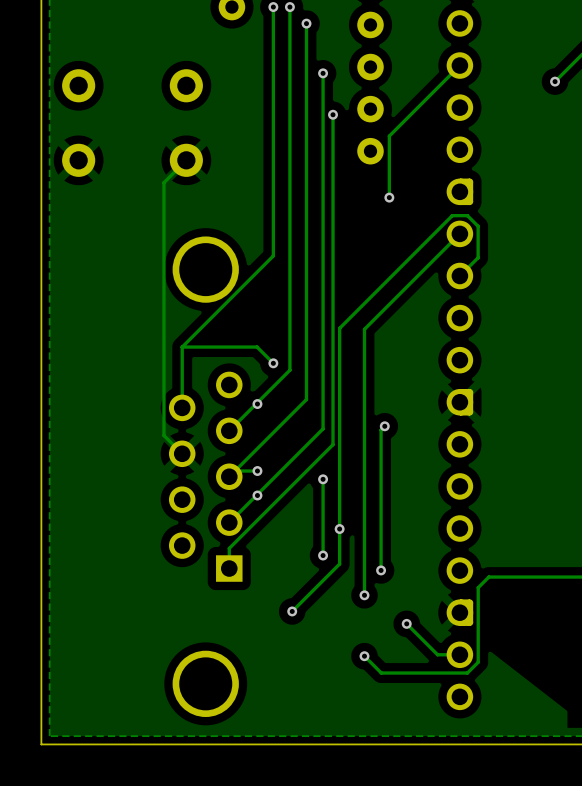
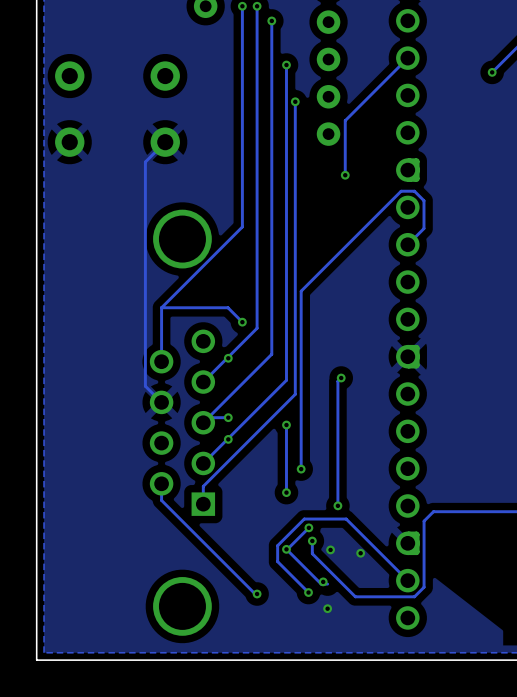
track: (459, 233) (364, 329) (364, 595) -> none
track: (339, 529) (339, 564) (292, 611) -> none
track: none -> (161, 483) (161, 500) (257, 593)
track: none -> (308, 527) (287, 549)
via: none -> (308, 527)
via: (364, 595) -> none
via: none -> (312, 541)
via: (292, 611) -> none
track: none -> (286, 549) (321, 584) (327, 584)
via: none -> (286, 549)
via: none -> (330, 549)
track: (406, 623) (437, 654) (459, 654) -> (308, 592) (277, 561) (277, 545) (304, 519) (346, 519) (407, 580)
track: (364, 656) (381, 673) (400, 673) -> (312, 541) (312, 553) (355, 596)
via: none -> (308, 592)
via: none -> (257, 594)
via: none -> (327, 608)

